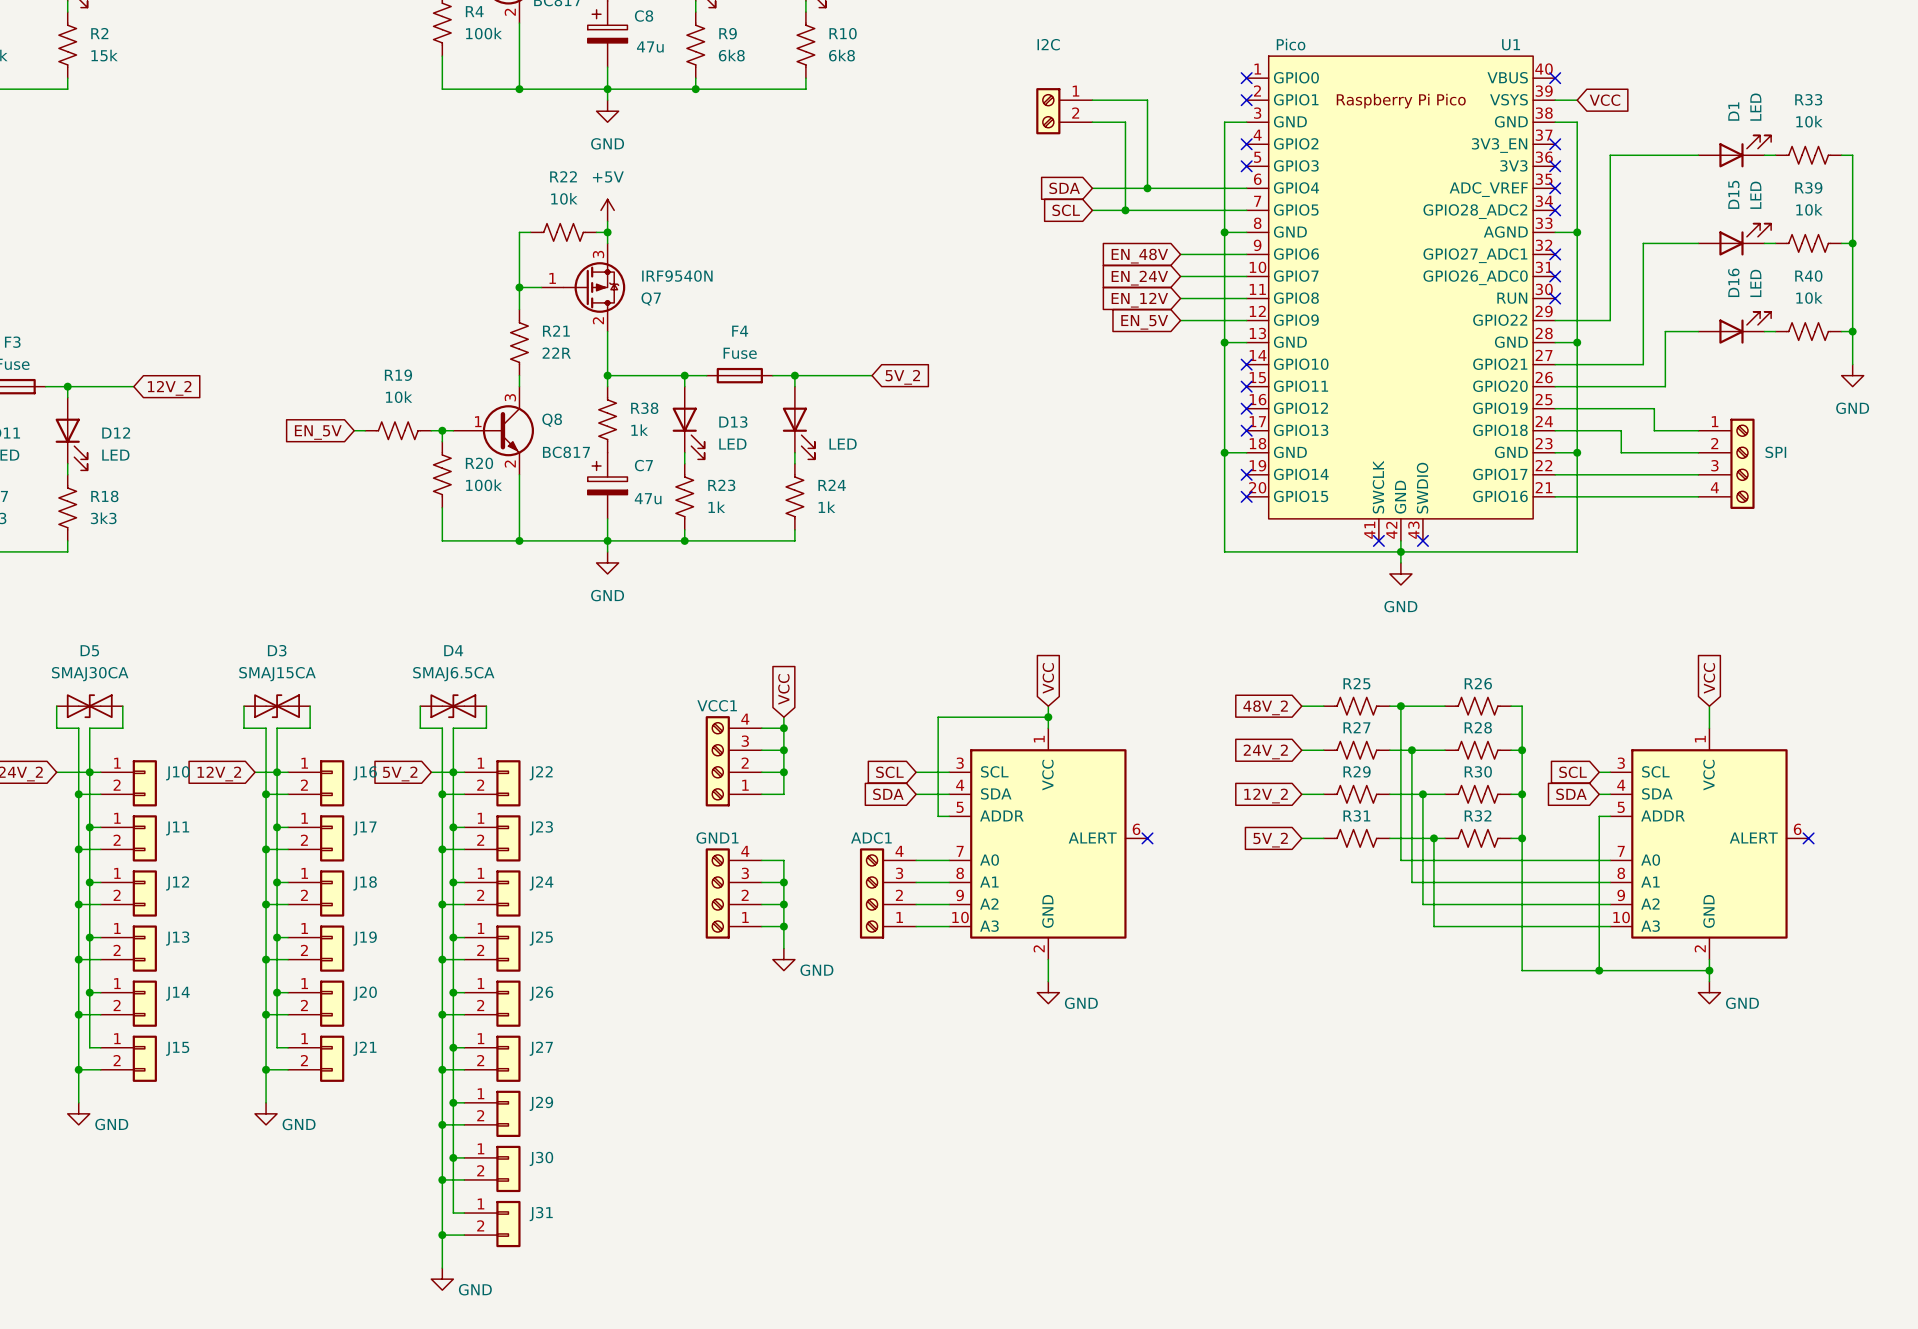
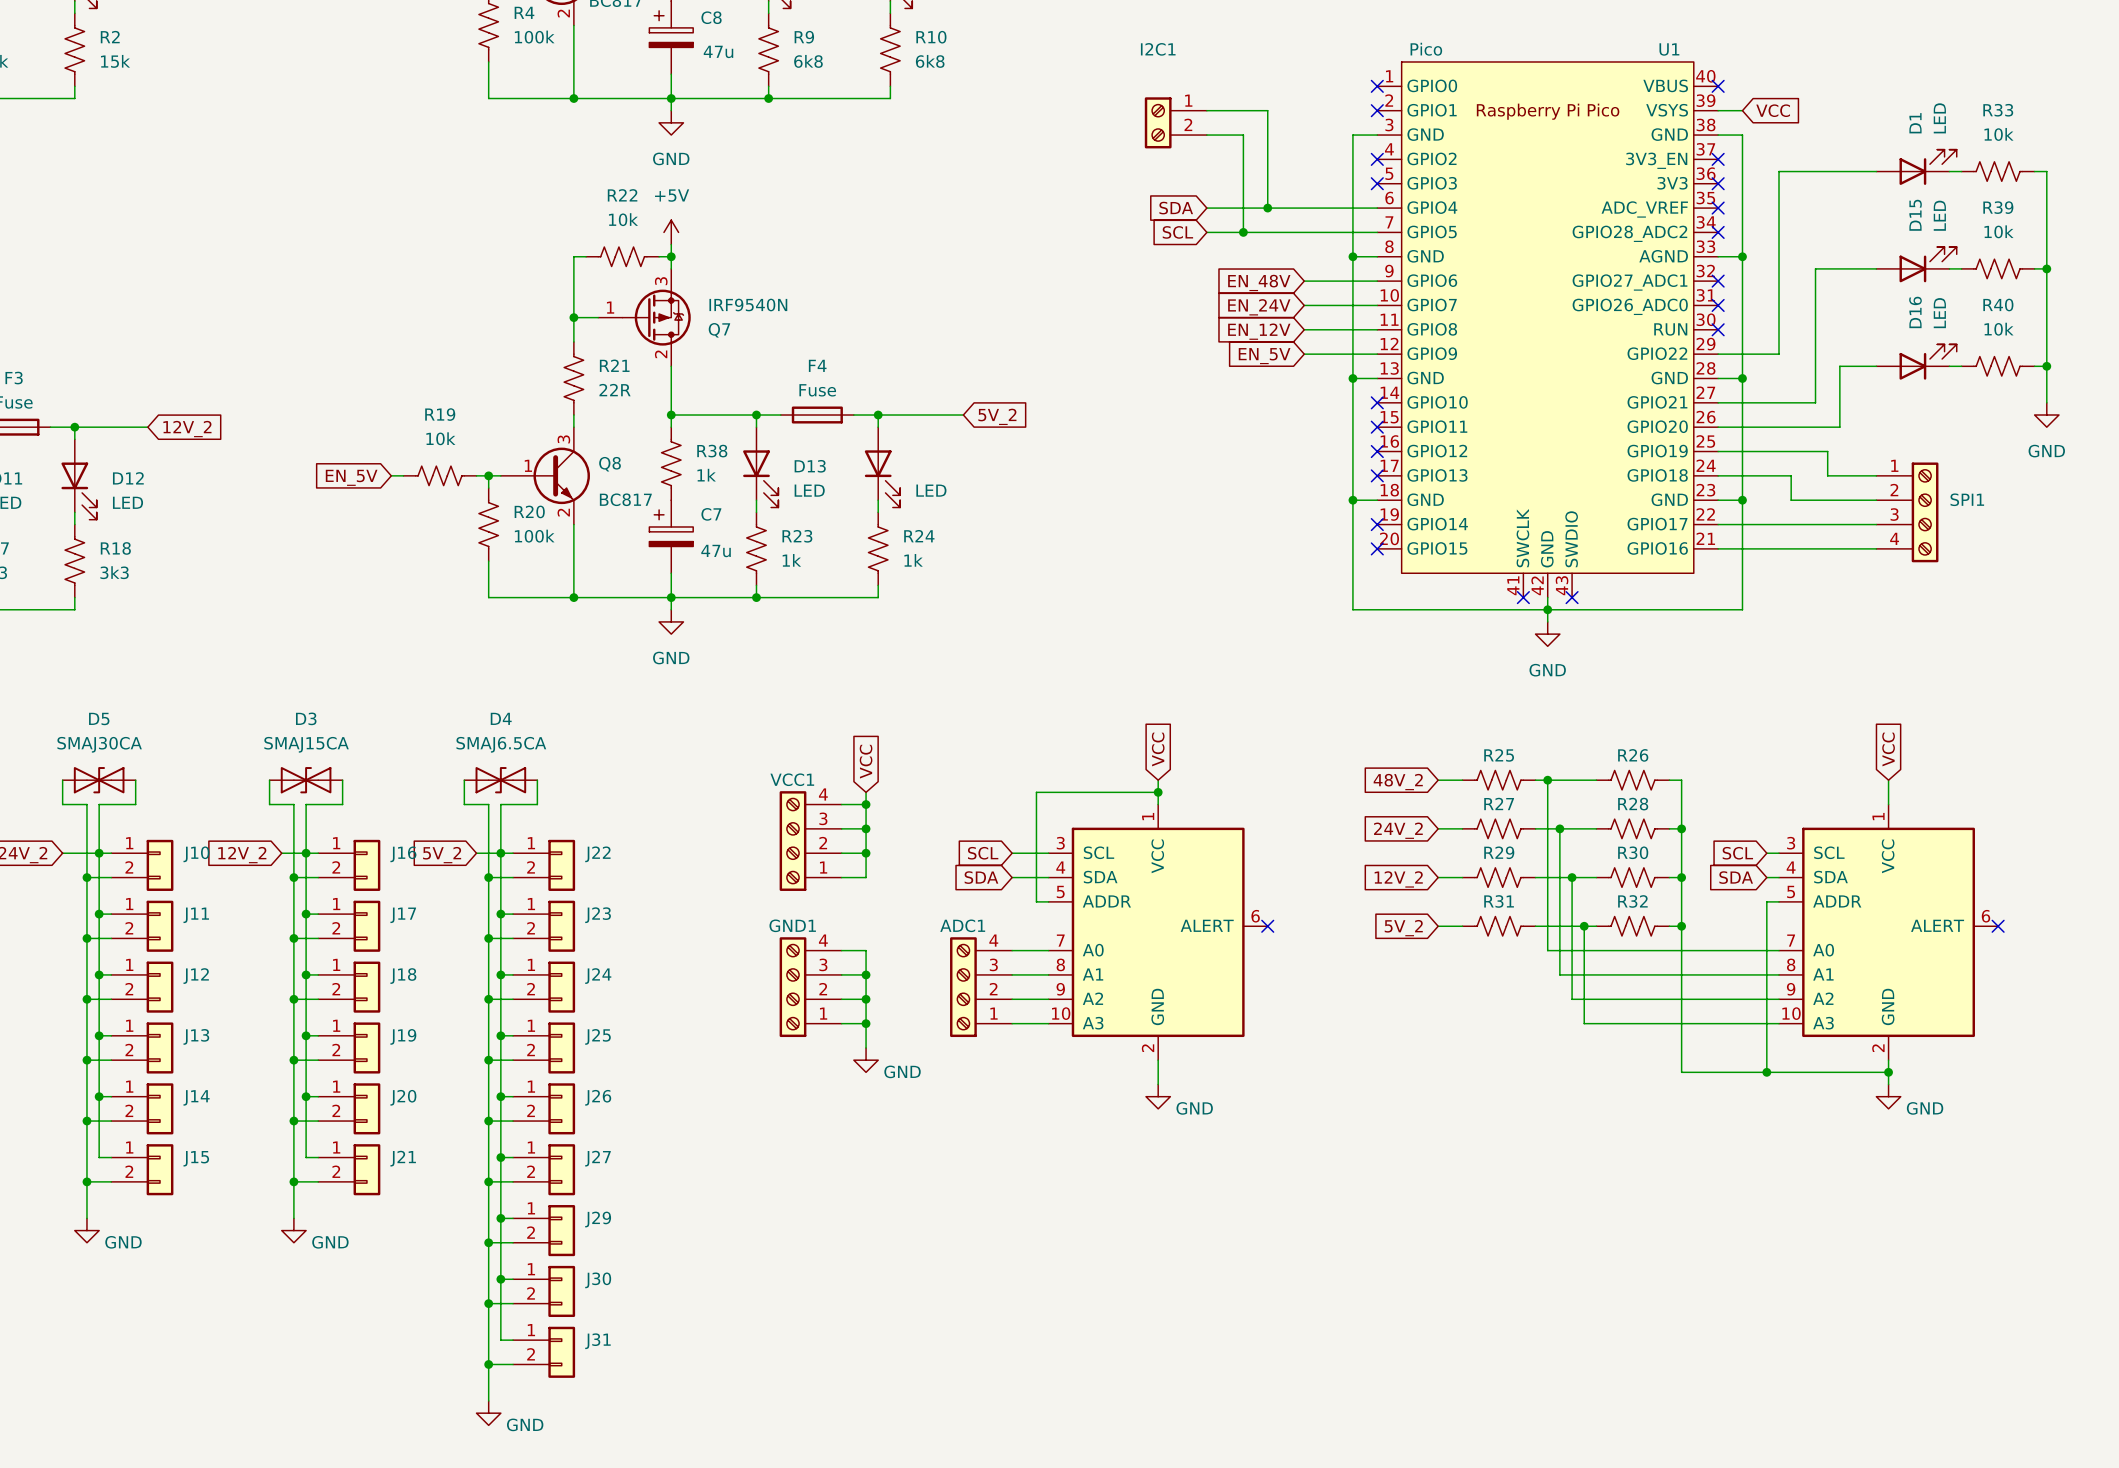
I2C name: I2C (1048, 44) -> I2C1 (1158, 49)
SPI name: SPI (1775, 452) -> SPI1 (1967, 499)

